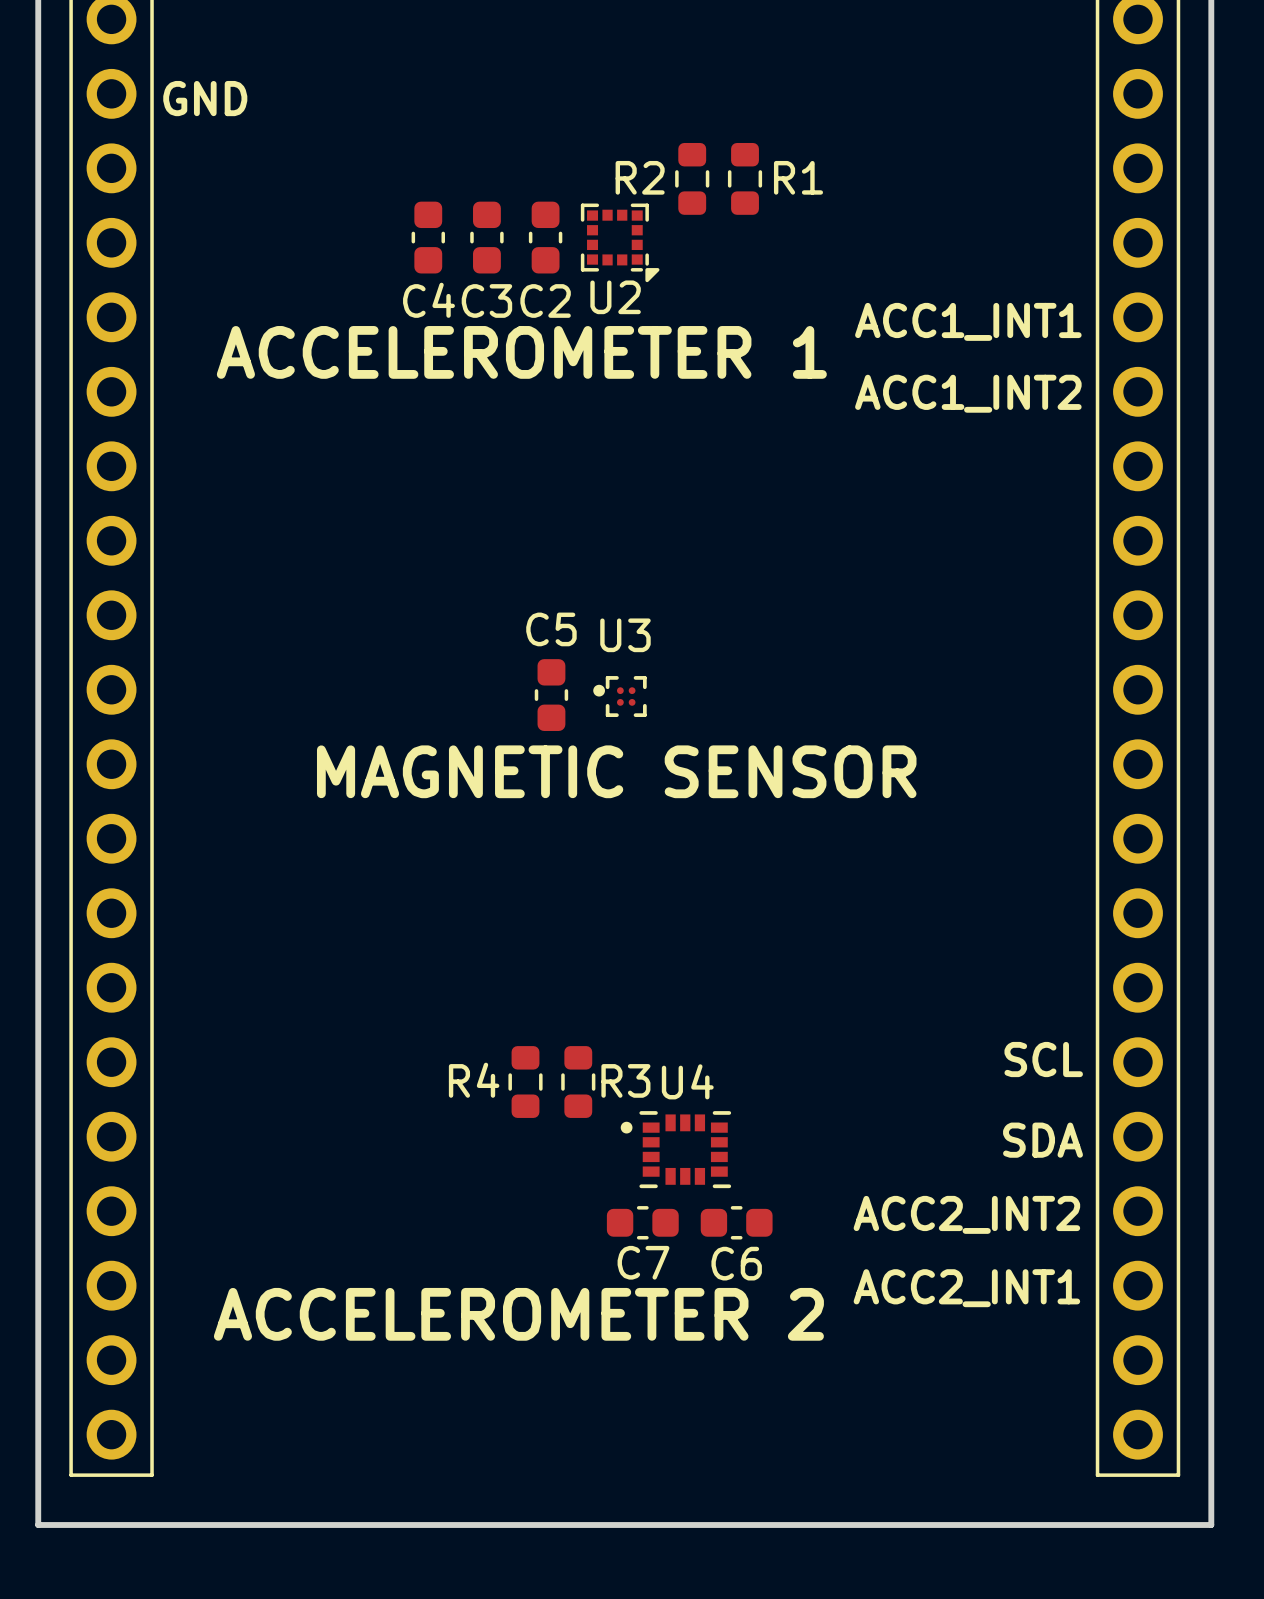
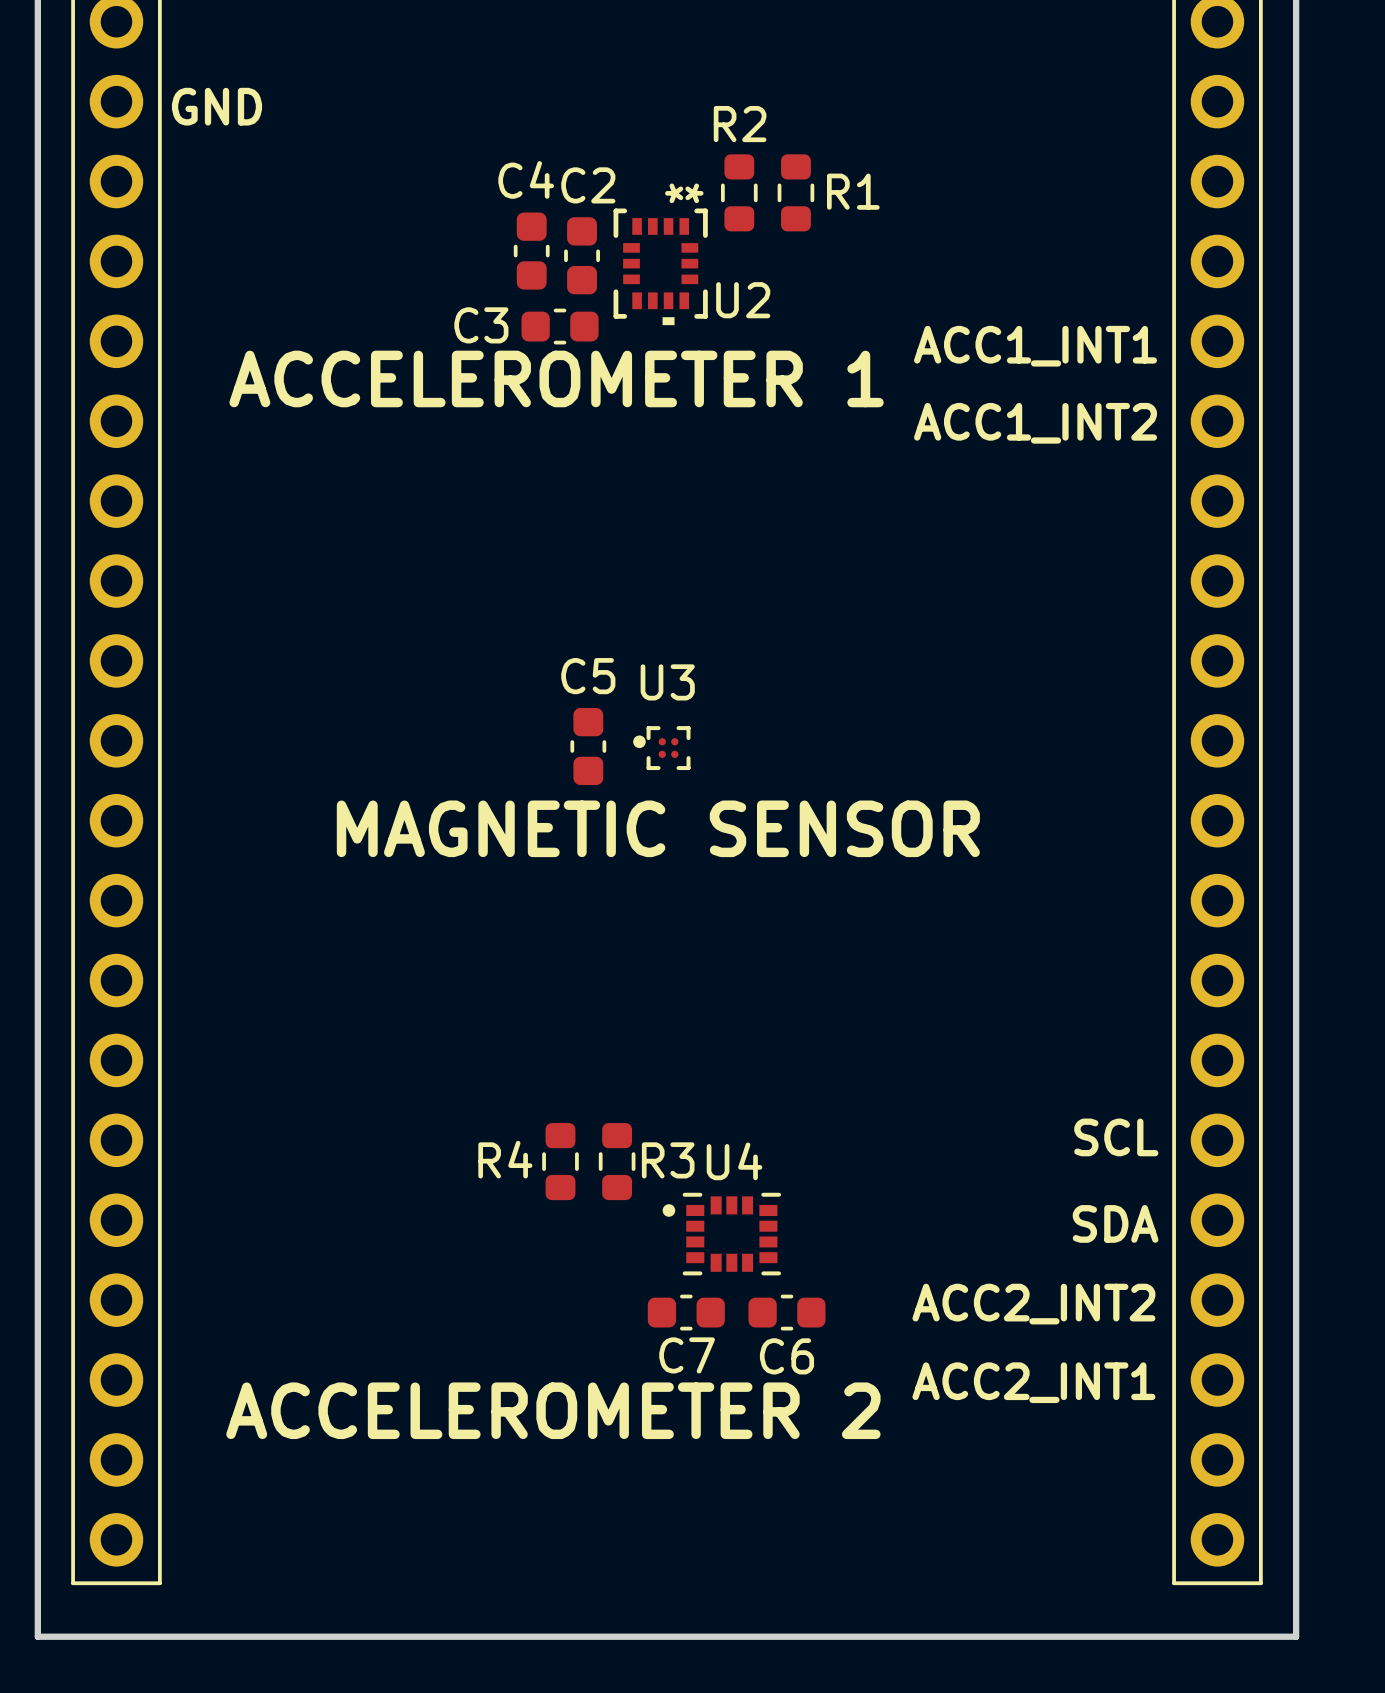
R2 name position: R2 (640, 177) -> R2 (740, 124)
U2 footprint: [580, 203, 660, 283] -> [613, 208, 708, 326]
C4 position: (428, 237) -> (531, 251)
C3 rotation: 0° (486, 237) -> 90° clockwise (560, 326)
C3 position: (486, 237) -> (560, 326)
U2 name position: U2 (615, 297) -> U2 (743, 300)
C4 name position: C4 (428, 300) -> C4 (526, 179)
C2 name position: C2 (545, 300) -> C2 (588, 185)

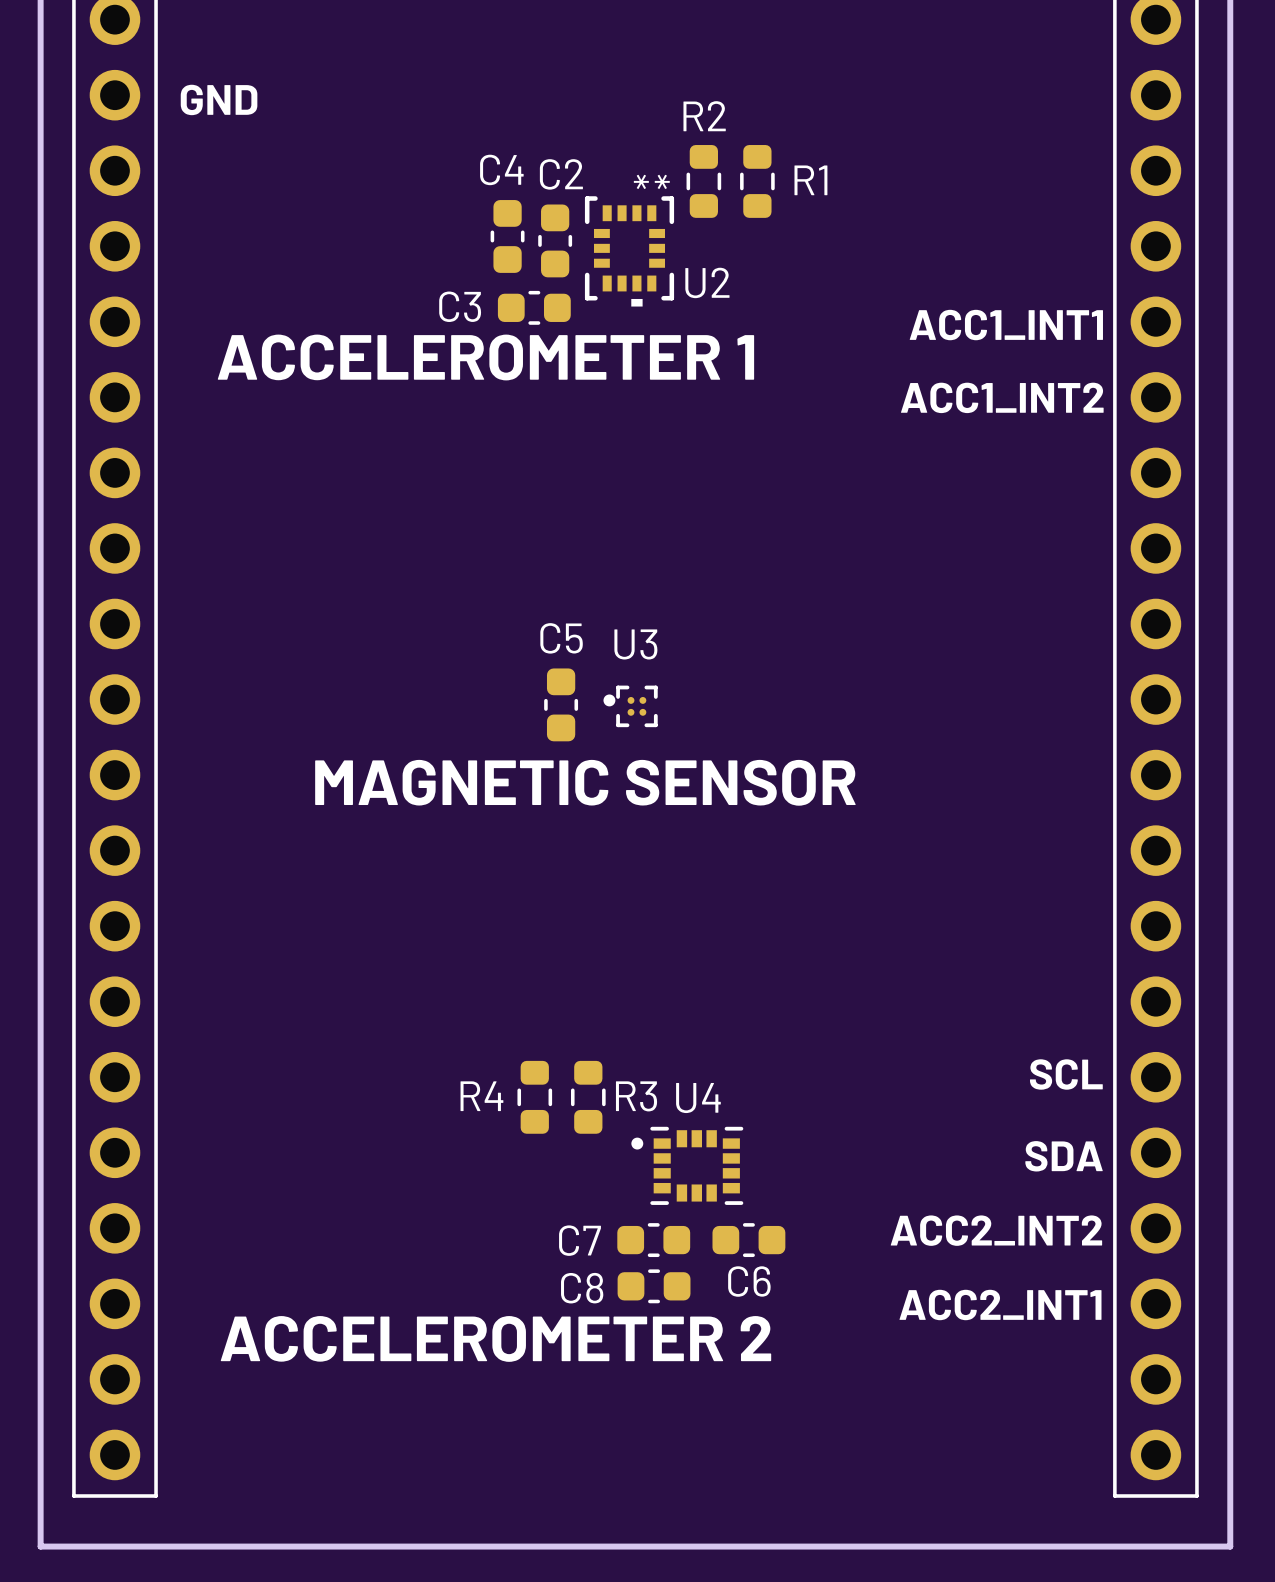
C7 name position: C7 (687, 1355) -> C7 (580, 1240)
C8: none -> (654, 1286)
text position: ACCELEROMETER 2 (553, 1410) -> ACCELEROMETER 2 (495, 1338)

